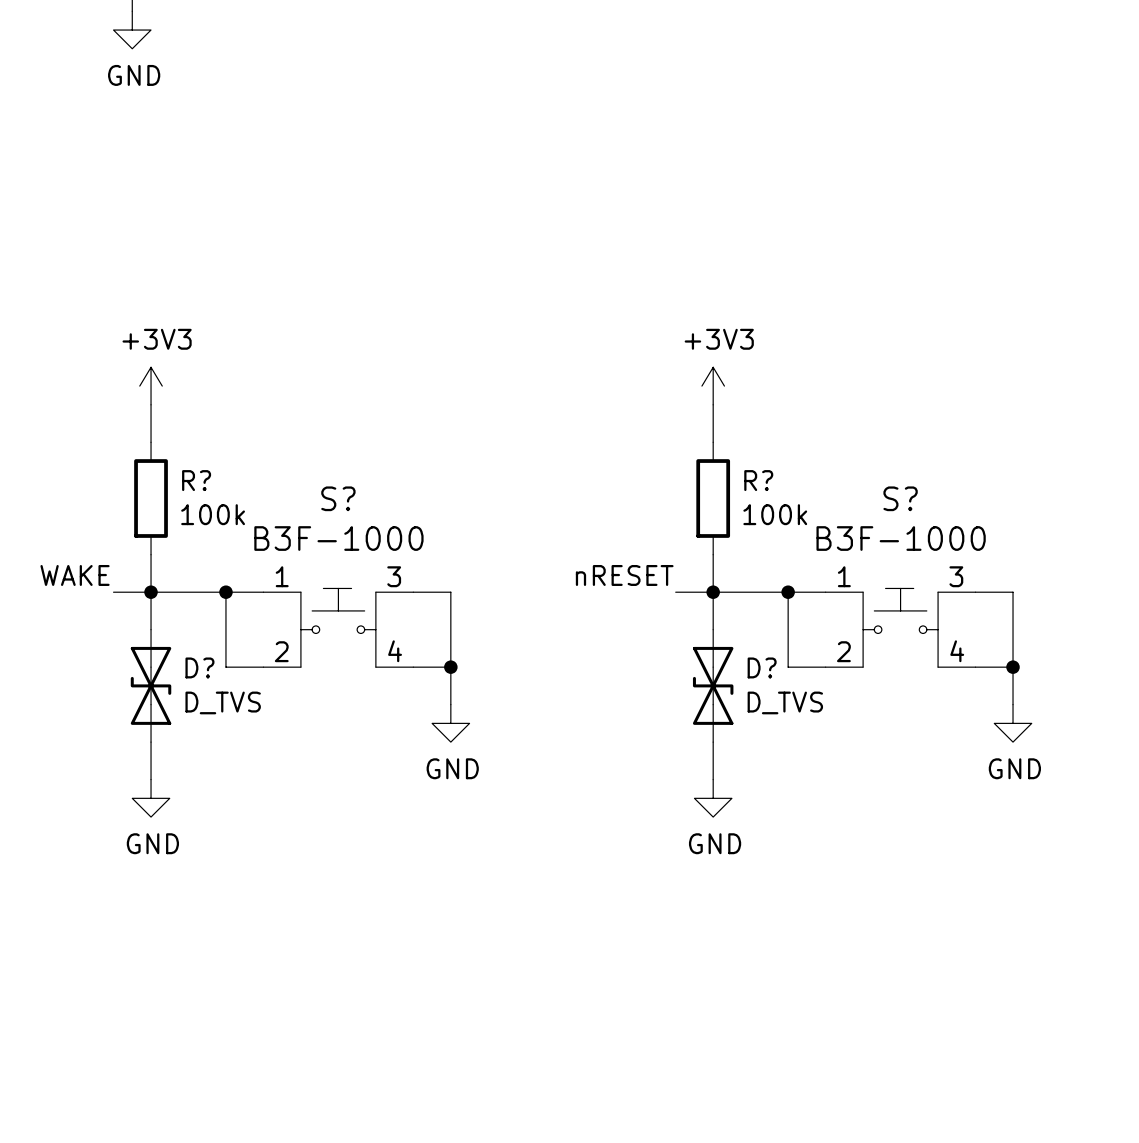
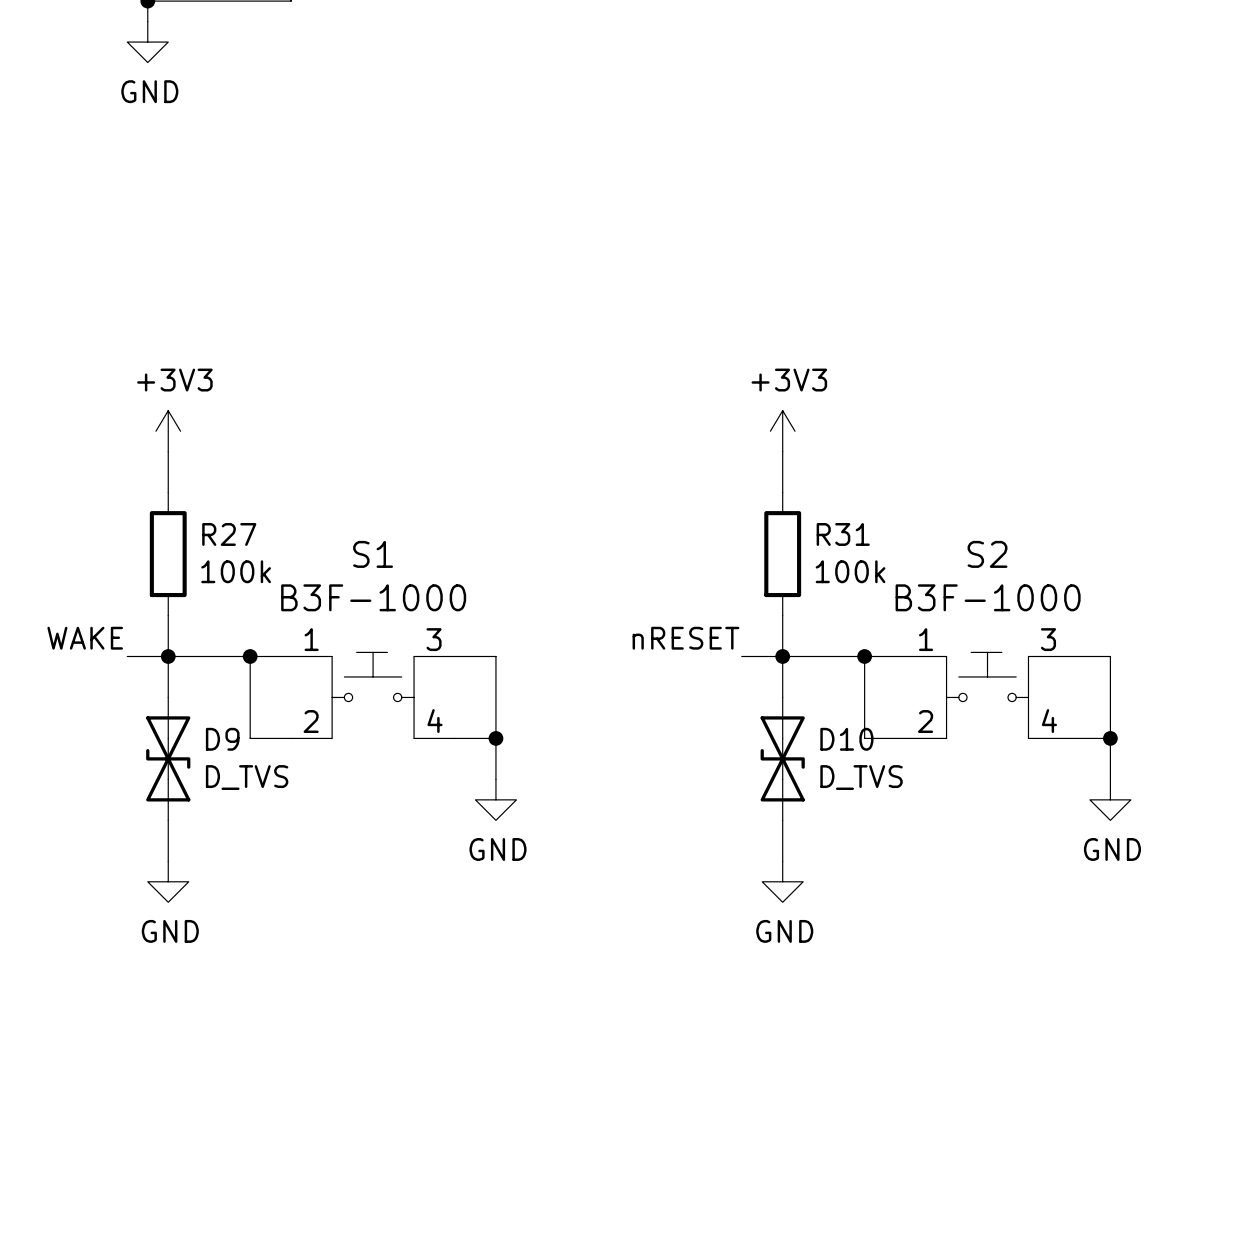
R? name: R? (196, 480) -> R27 (229, 534)
R? name: R? (758, 480) -> R31 (843, 534)
S? name: S? (338, 498) -> S1 (373, 554)
S? name: S? (900, 498) -> S2 (987, 554)
D? name: D? (199, 667) -> D9 (222, 739)
D? name: D? (762, 667) -> D10 (846, 739)

